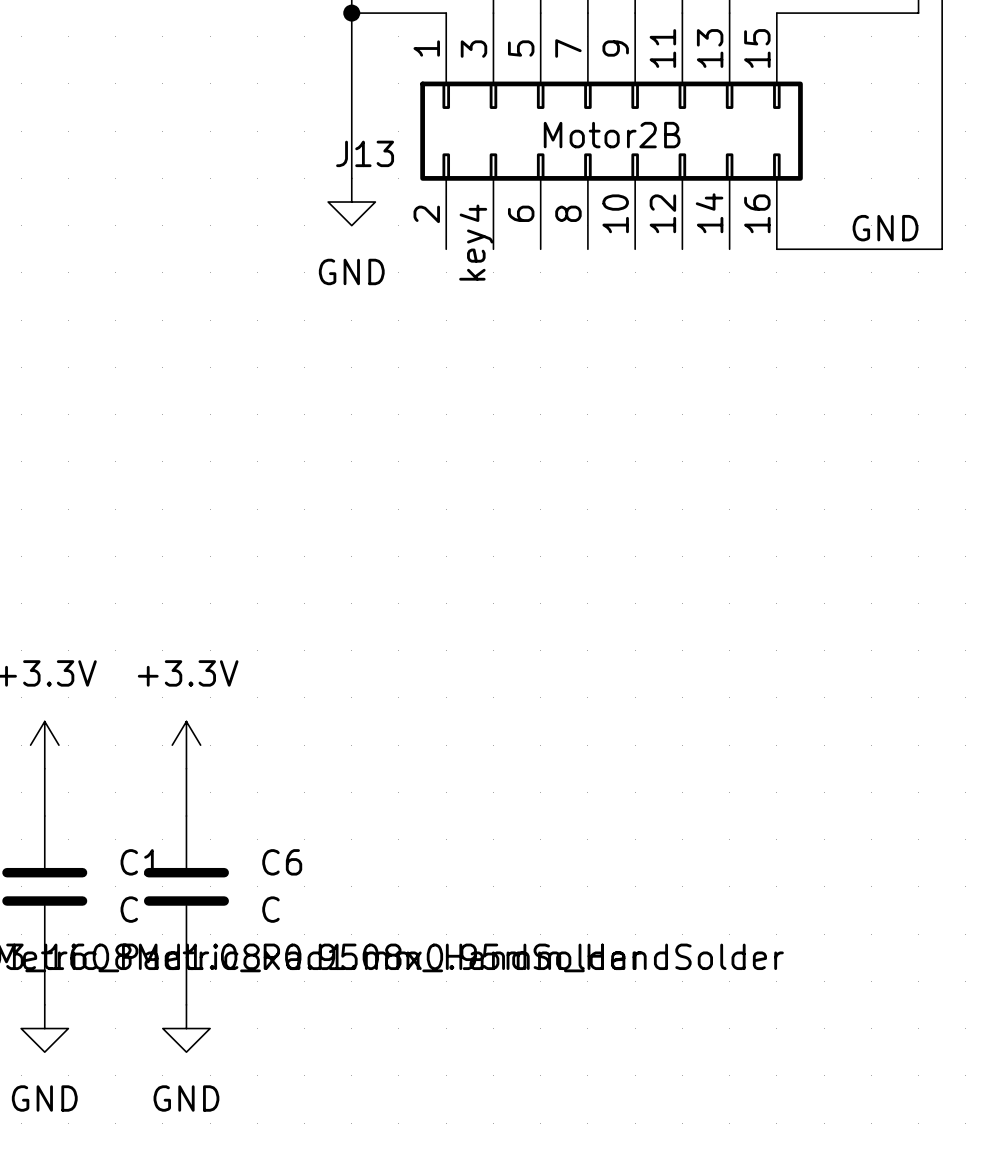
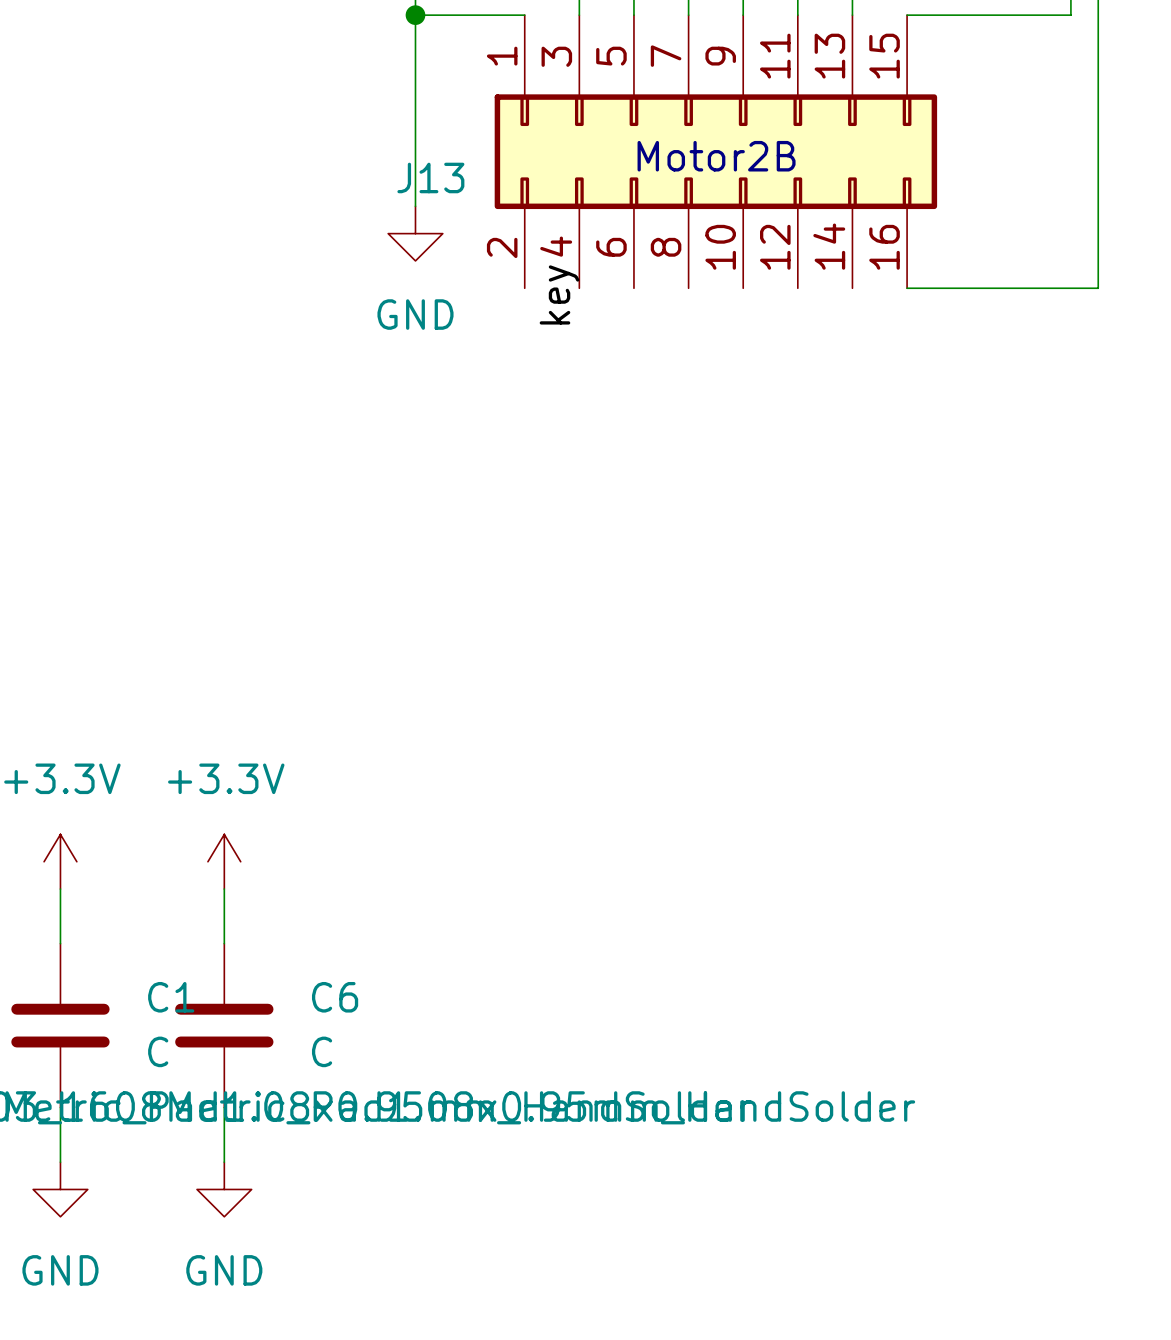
label: GND (885, 228) -> none

